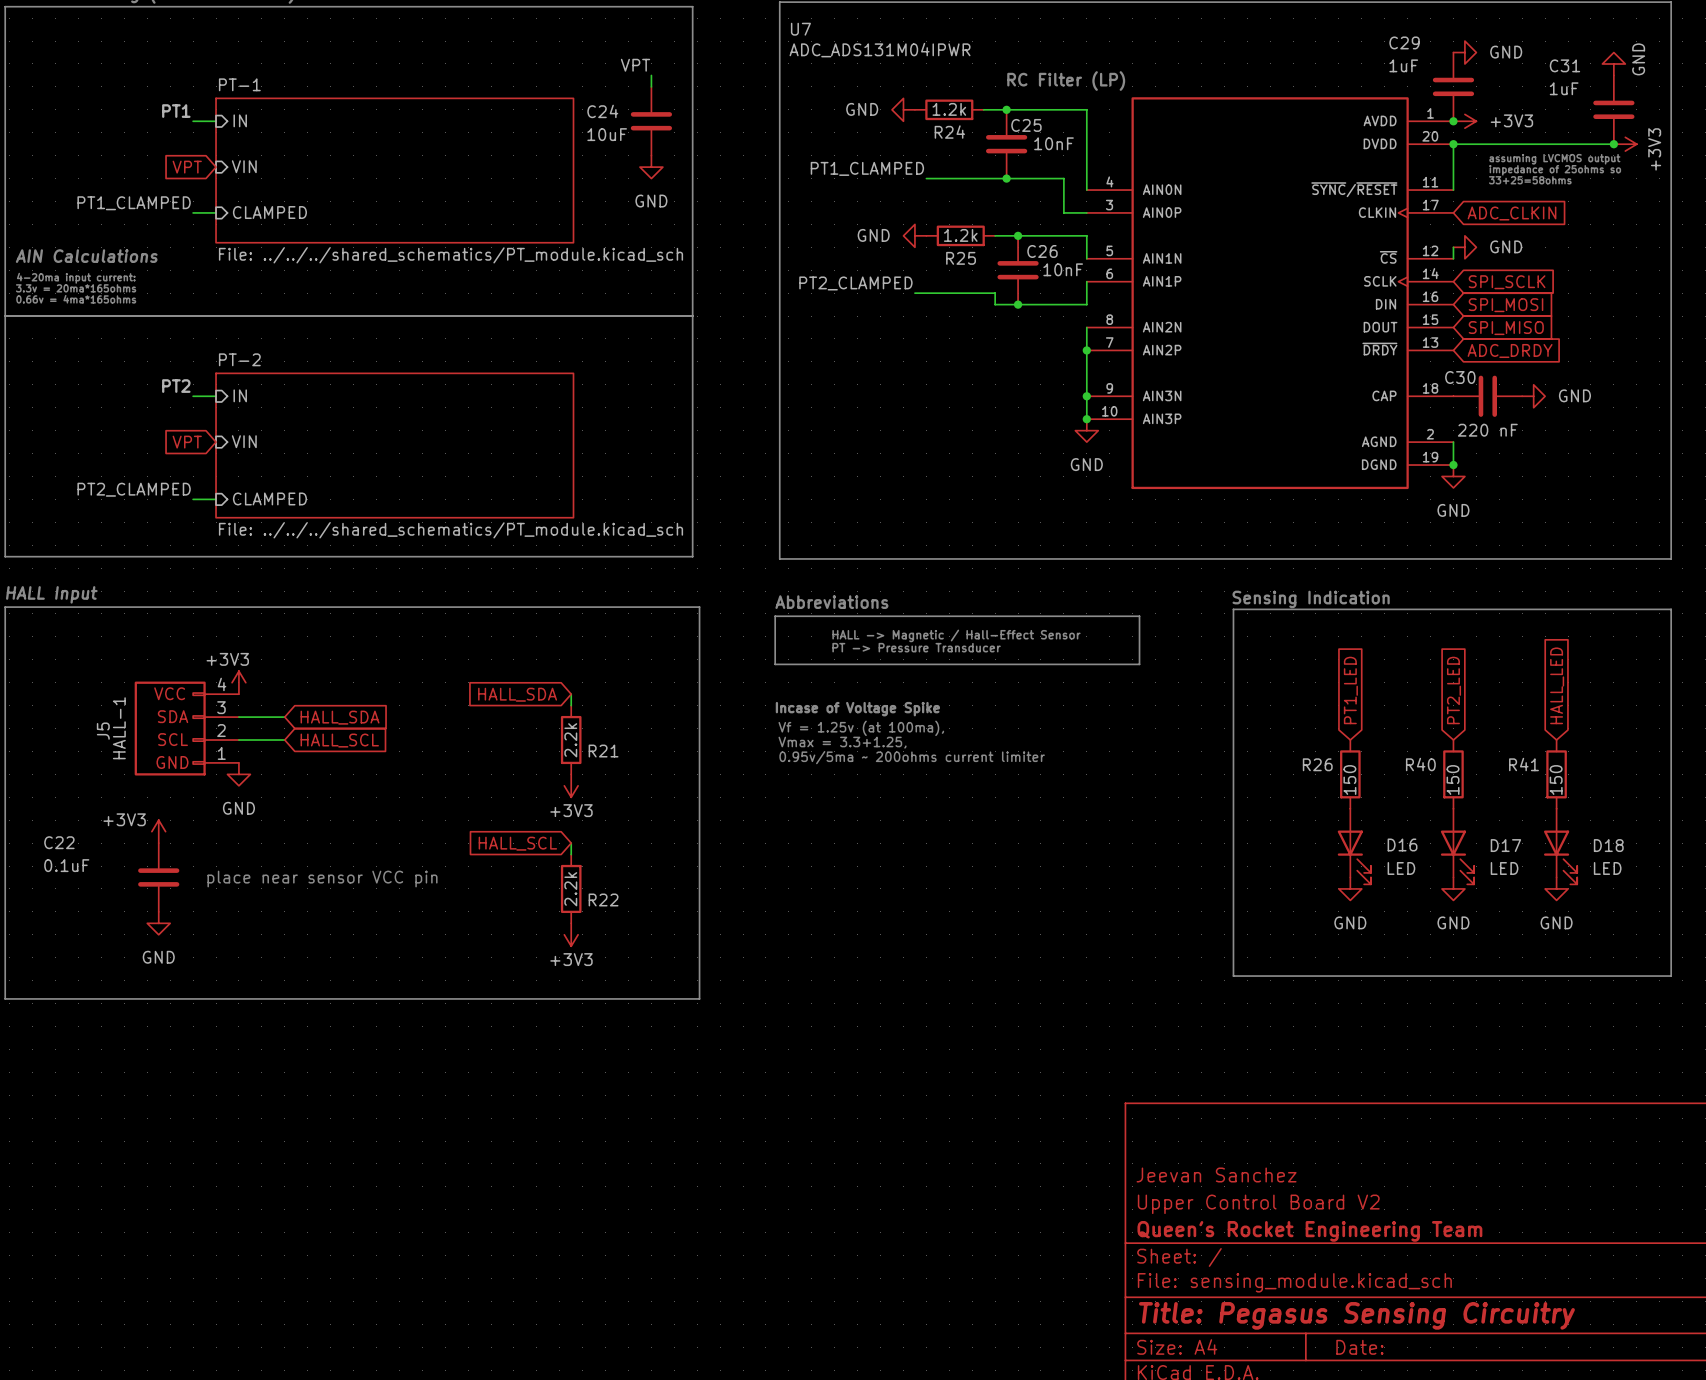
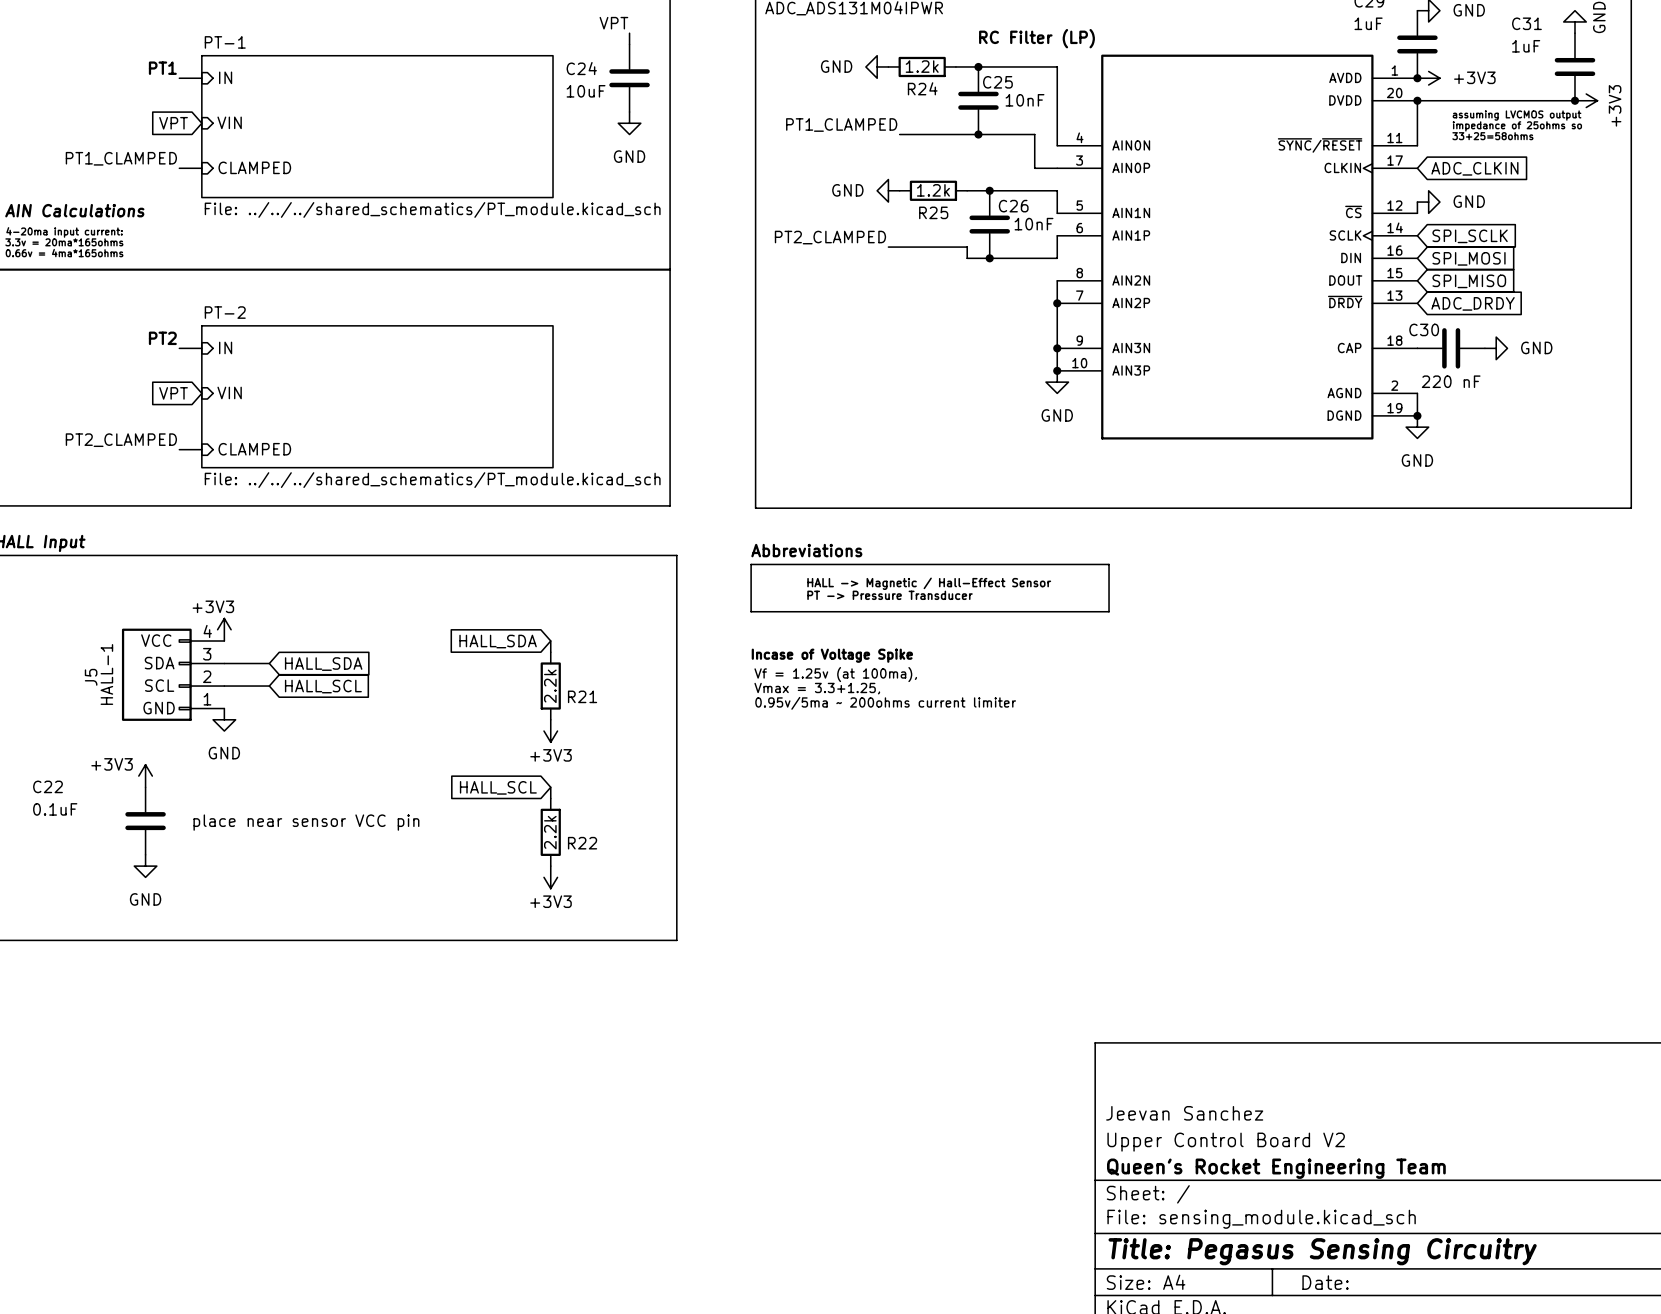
text: Sensing Indication (1311, 599) -> none
line: (1233, 609) (1671, 609) (1671, 976) (1233, 976) (1233, 609) -> none
global label: HALL_LED (1557, 685) -> none
global label: PT1_LED (1350, 690) -> none
global label: PT2_LED (1454, 690) -> none
R26: 150 (1350, 774) -> none
R40: 150 (1453, 774) -> none
R41: 150 (1556, 774) -> none
D16: LED (1354, 846) -> none
D17: LED (1457, 846) -> none
D18: LED (1560, 846) -> none
power symbol: GND (1350, 888) -> none
power symbol: GND (1453, 888) -> none
power symbol: GND (1556, 888) -> none

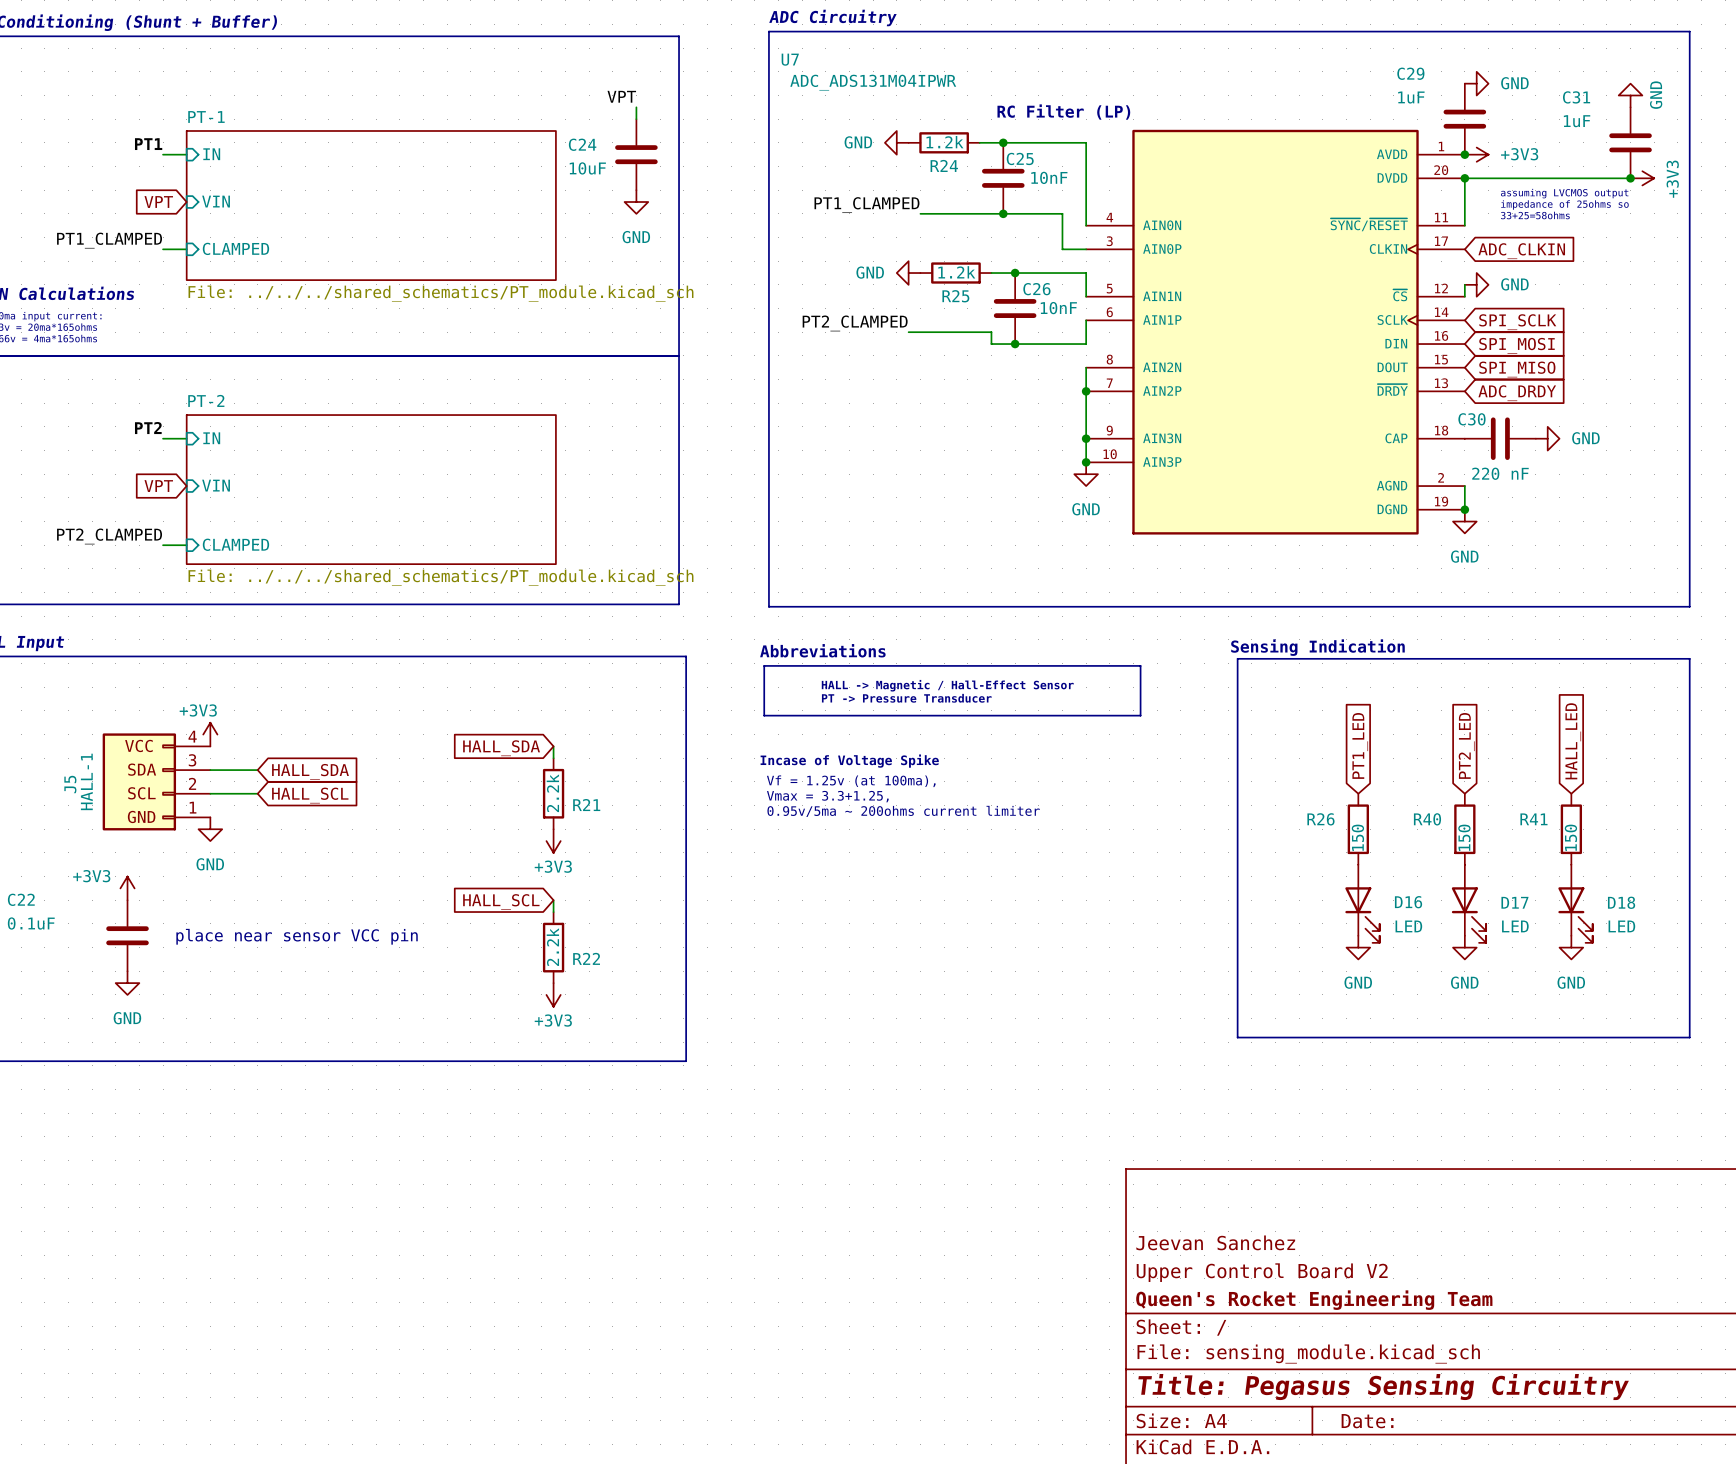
text: none -> Sensing Indication (1317, 647)
line: none -> (1237, 658) (1689, 658) (1689, 1037) (1237, 1037) (1237, 658)
global label: none -> HALL_LED (1573, 741)
global label: none -> PT1_LED (1360, 745)
global label: none -> PT2_LED (1466, 745)
R26: none -> 150 (1358, 829)
R40: none -> 150 (1464, 829)
R41: none -> 150 (1571, 829)
D16: none -> LED (1362, 903)
D17: none -> LED (1468, 903)
D18: none -> LED (1575, 903)
power symbol: none -> GND (1358, 947)
power symbol: none -> GND (1464, 947)
power symbol: none -> GND (1571, 947)

